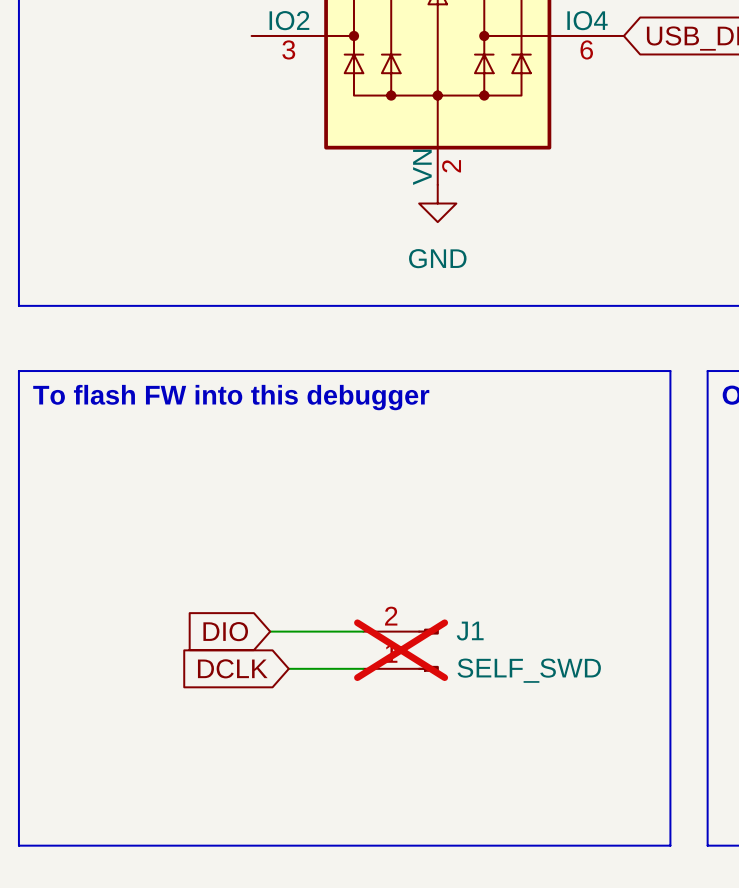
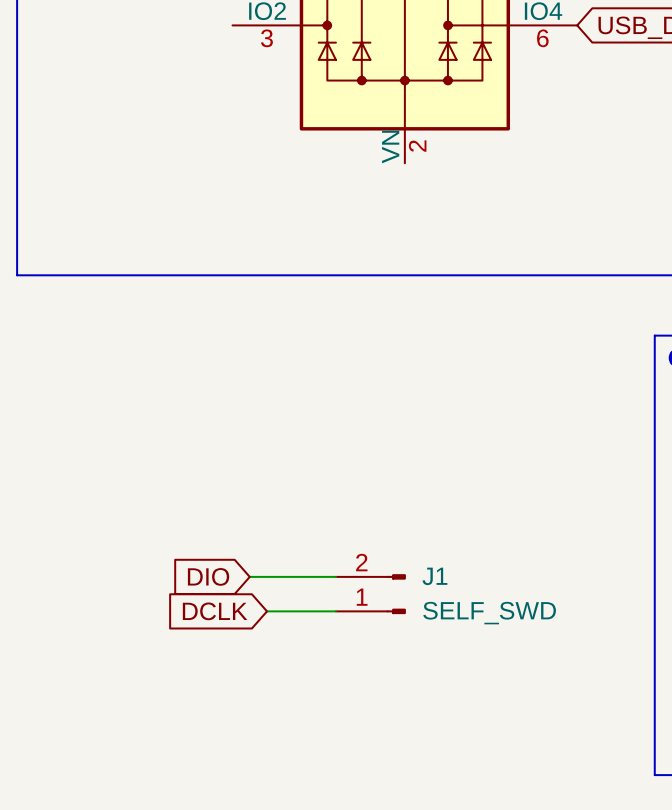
power symbol: GND (437, 203) -> none
line: (18, 371) (670, 371) (670, 845) (18, 845) (18, 371) -> none
text: To flash FW into this debugger (231, 397) -> none
J1 do-not-place cross: (401, 650) -> none

